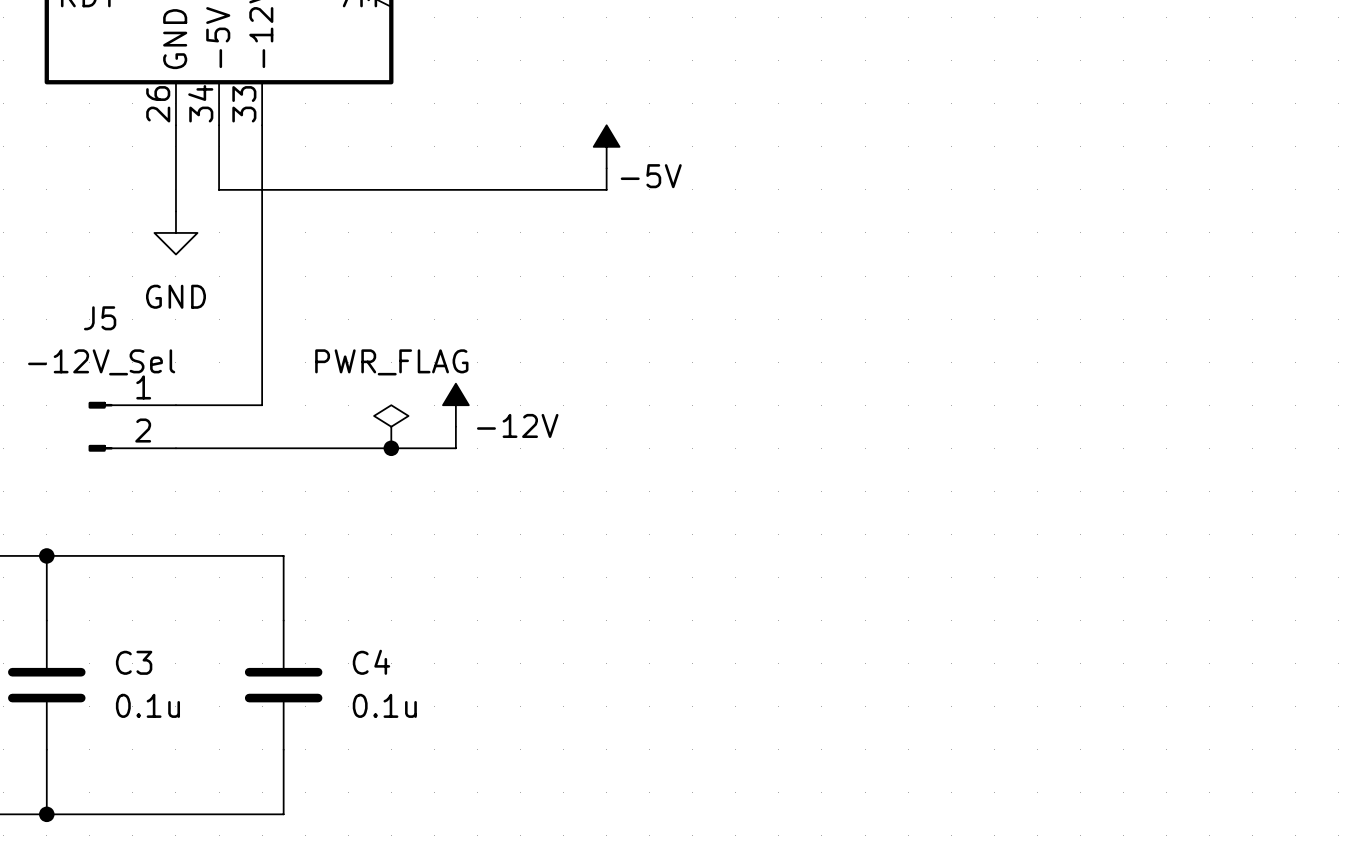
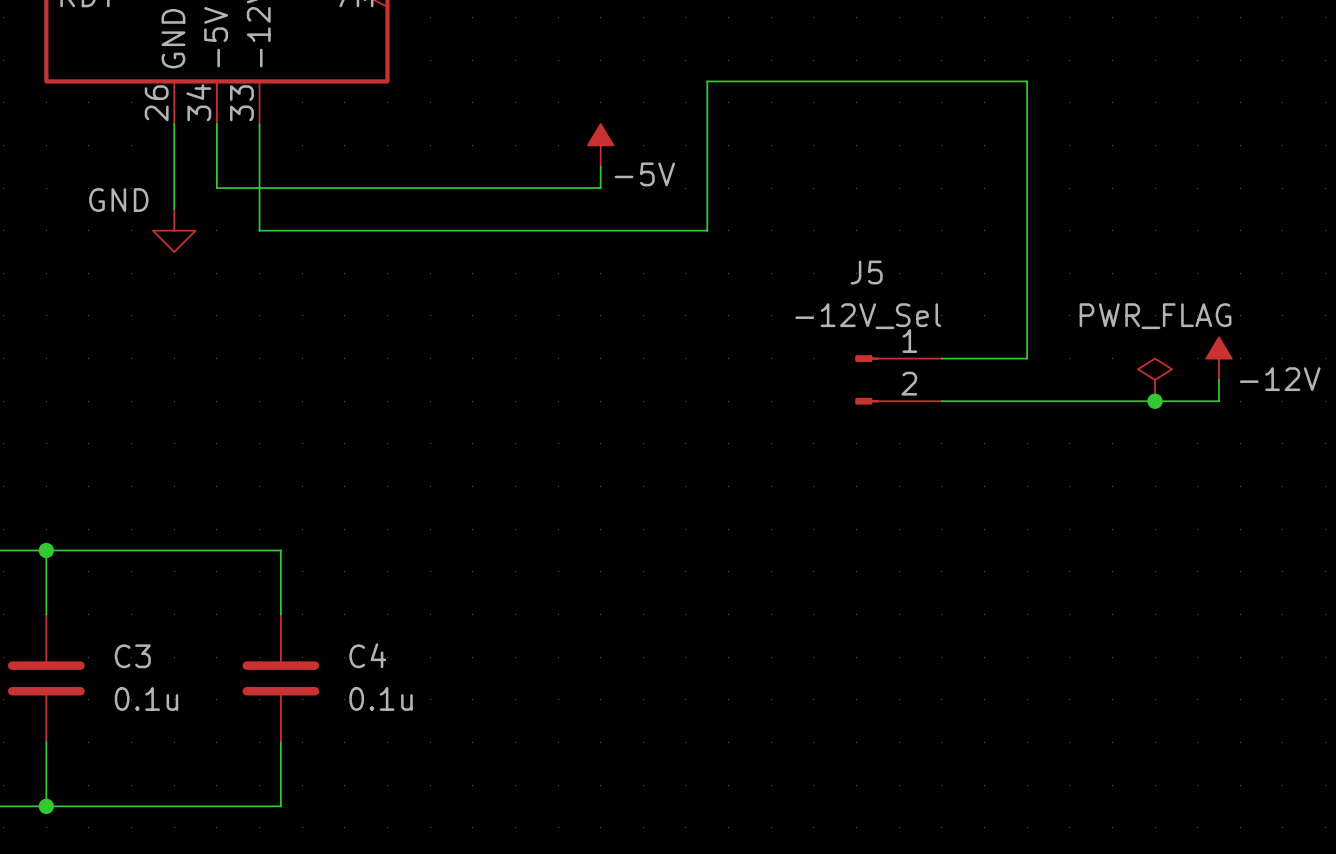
wire: (262, 232) (262, 405) (175, 405) -> (259, 230) (707, 230) (707, 81) (1027, 81) (1027, 358) (941, 358)
power symbol text position: GND (175, 296) -> GND (118, 200)
power symbol: none -> -12V (1218, 358)
power symbol: none -> PWR_FLAG (1155, 379)
wire: none -> (1218, 379) (1218, 401) (941, 401)
power symbol: -12V (455, 405) -> none
junction: none -> (1155, 401)
J5 position: (132, 426) -> (898, 379)
power symbol: PWR_FLAG (391, 426) -> none
wire: (455, 426) (455, 448) (175, 448) -> none
junction: (391, 448) -> none

